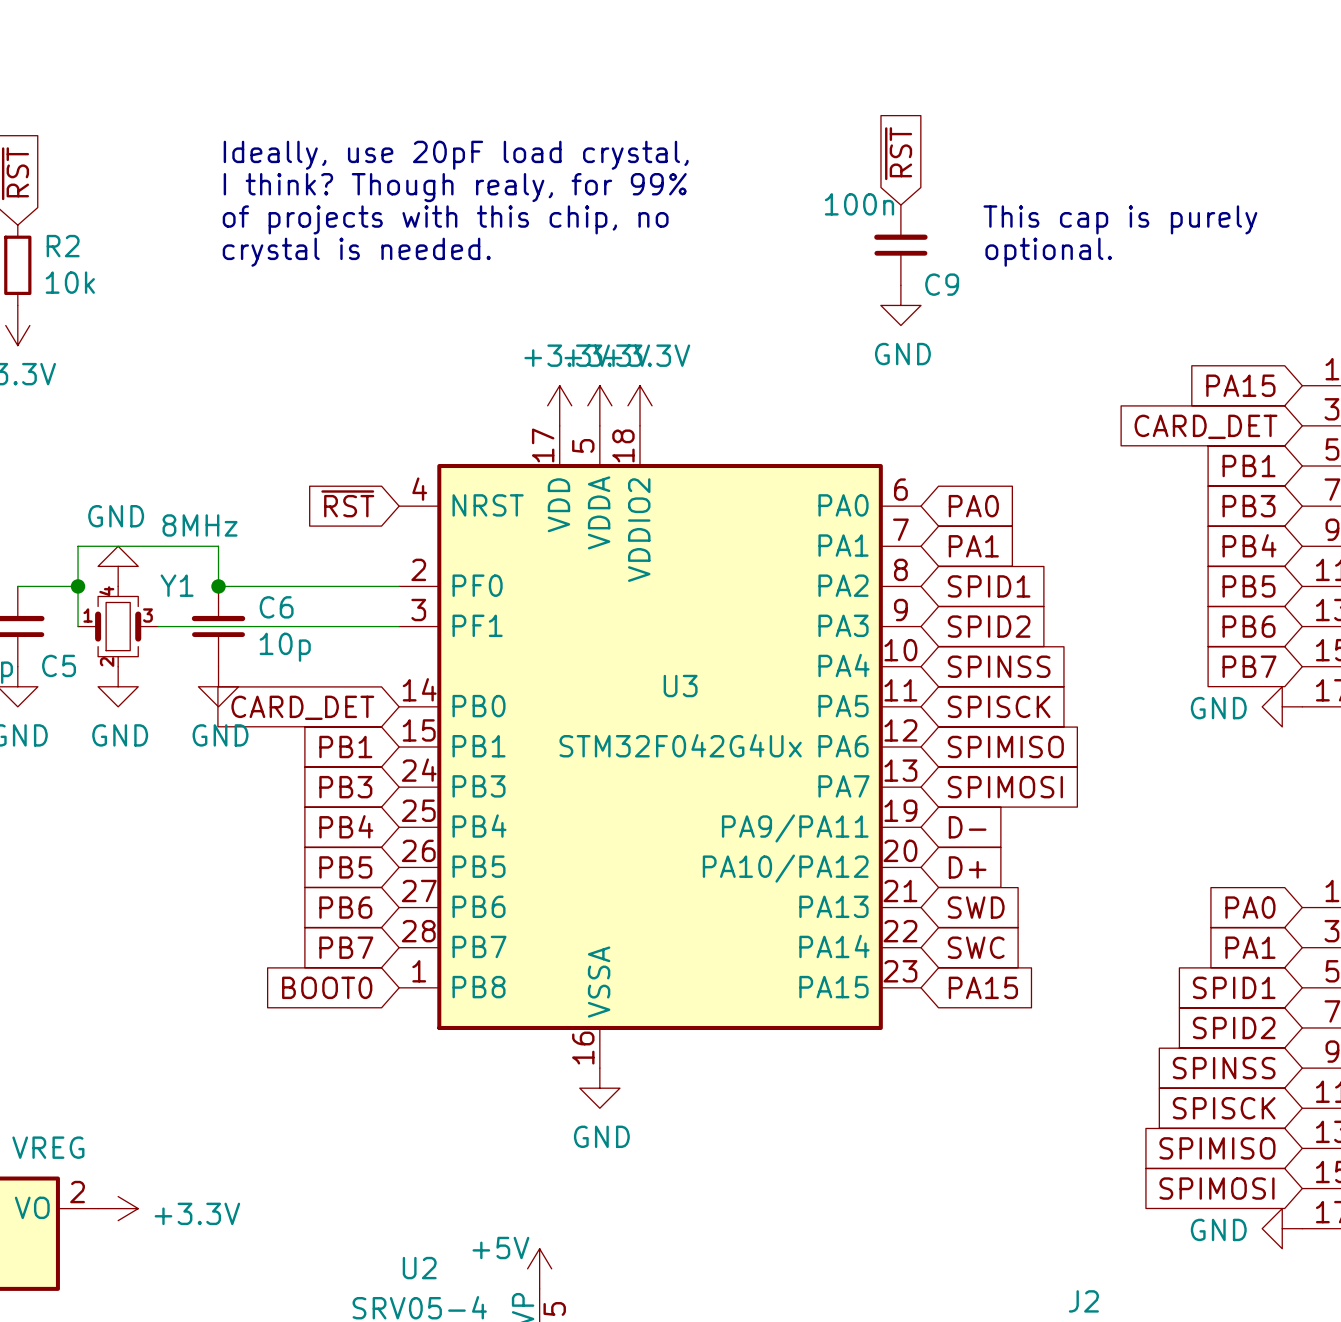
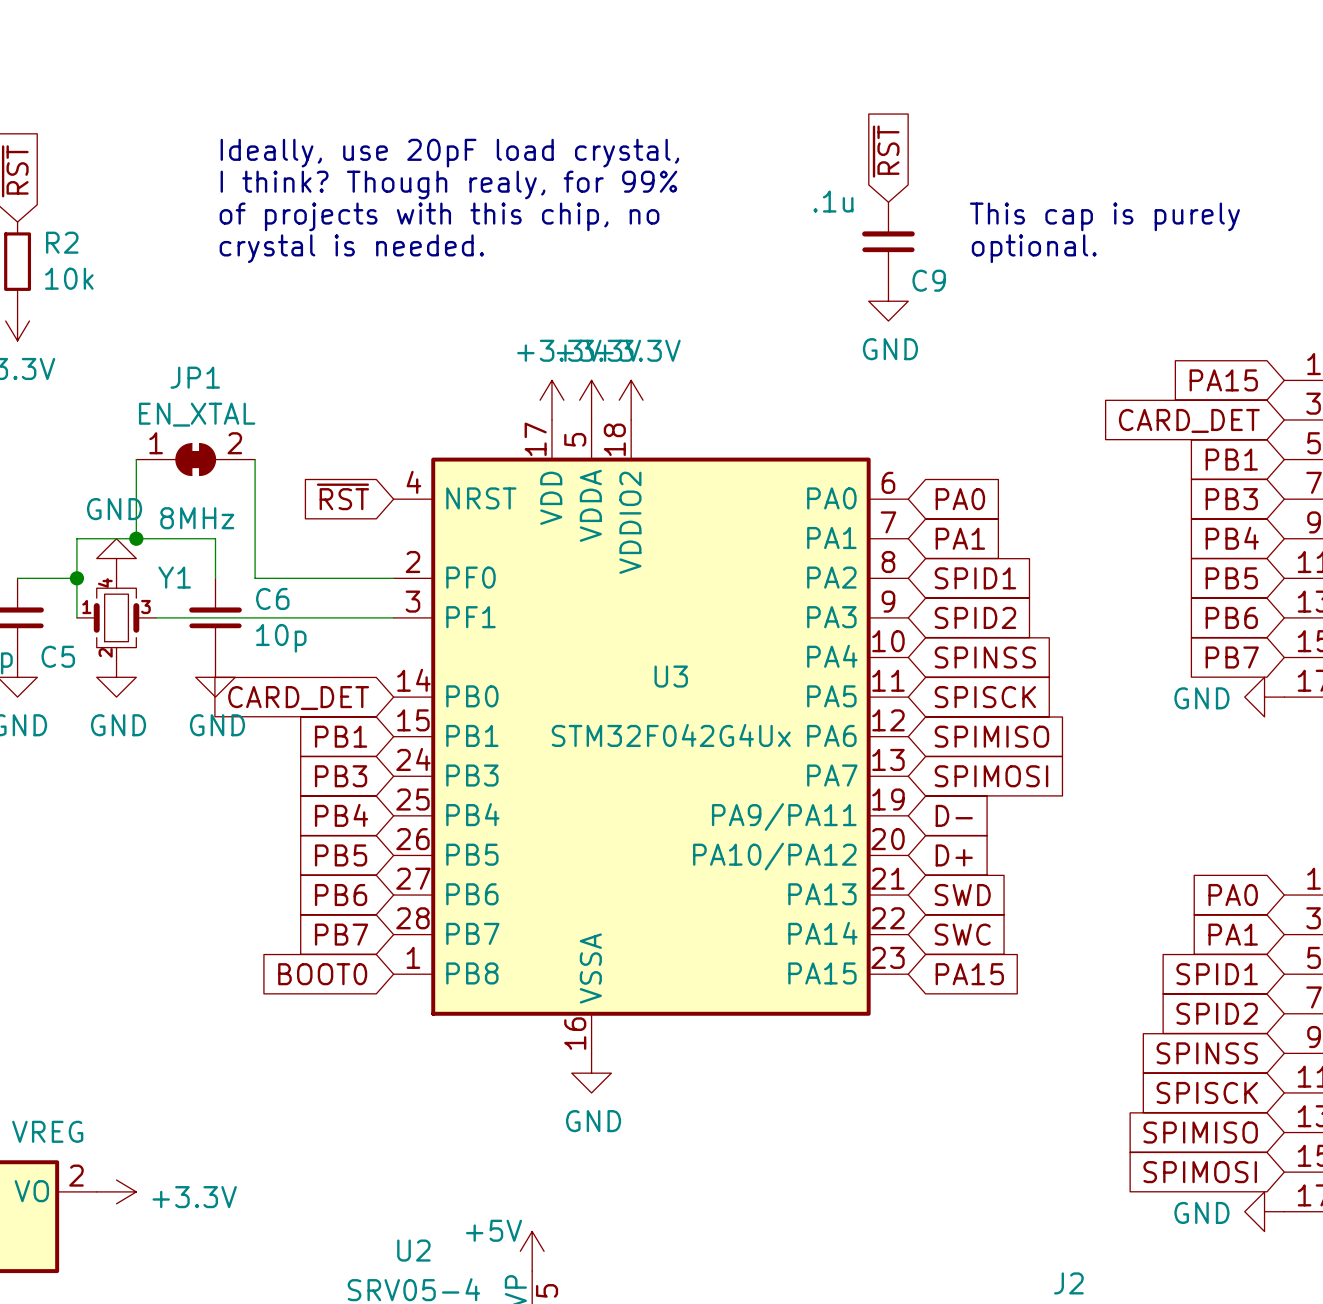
C9 value: 100n (859, 204) -> .1u (833, 201)
wire: none -> (136, 459) (136, 538)
JP1: none -> EN_XTAL (195, 459)
wire: (218, 586) (258, 586) -> (255, 459) (255, 578)
junction position: (218, 586) -> (136, 538)

